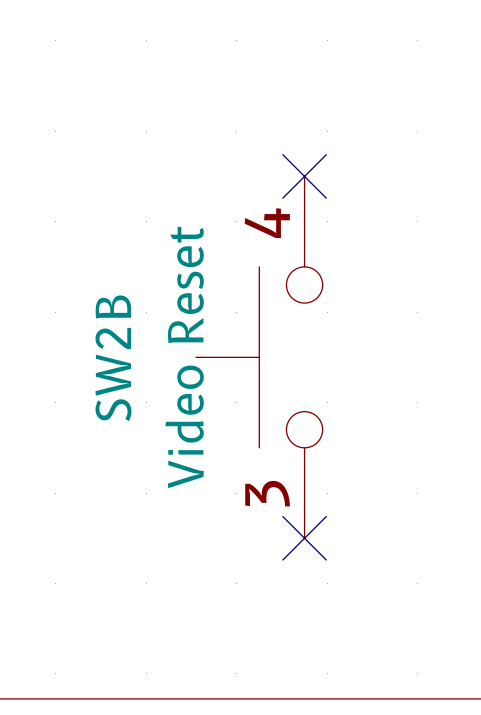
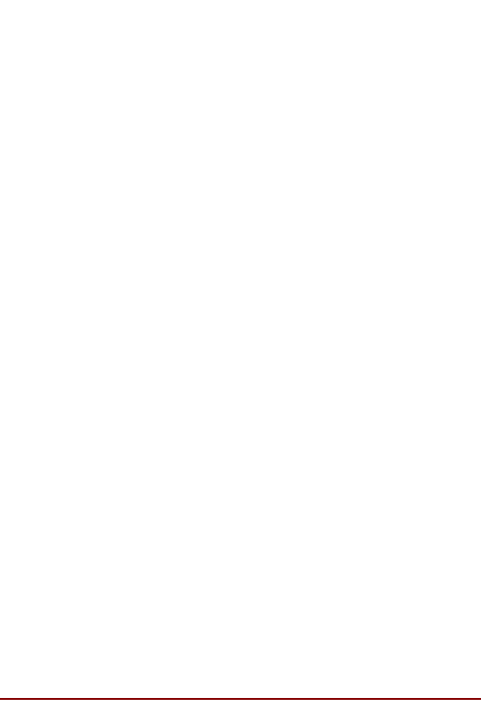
no-connect mark: (304, 176) -> none
SW2B: Video Reset (259, 357) -> none
no-connect mark: (304, 538) -> none

